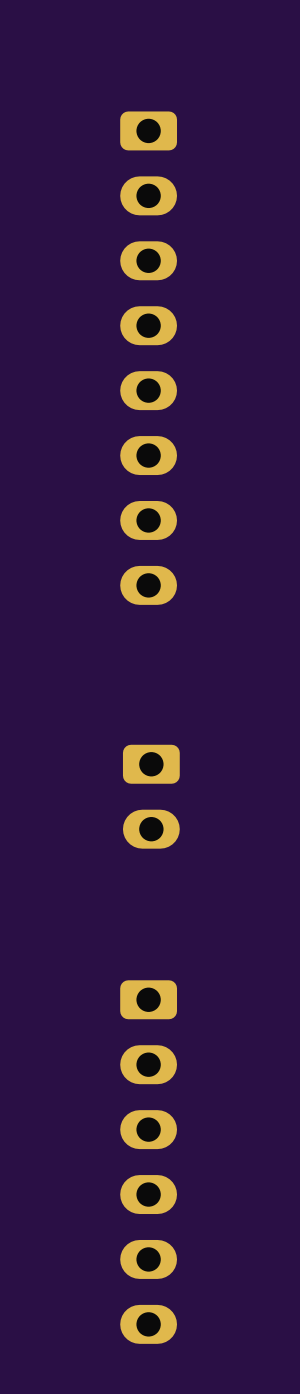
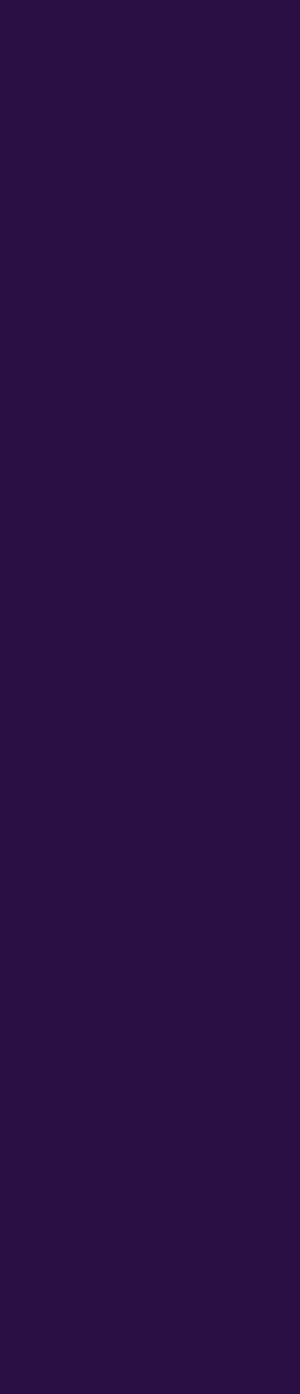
part: (148, 358) -> none
part: (151, 796) -> none
part: (148, 1162) -> none

